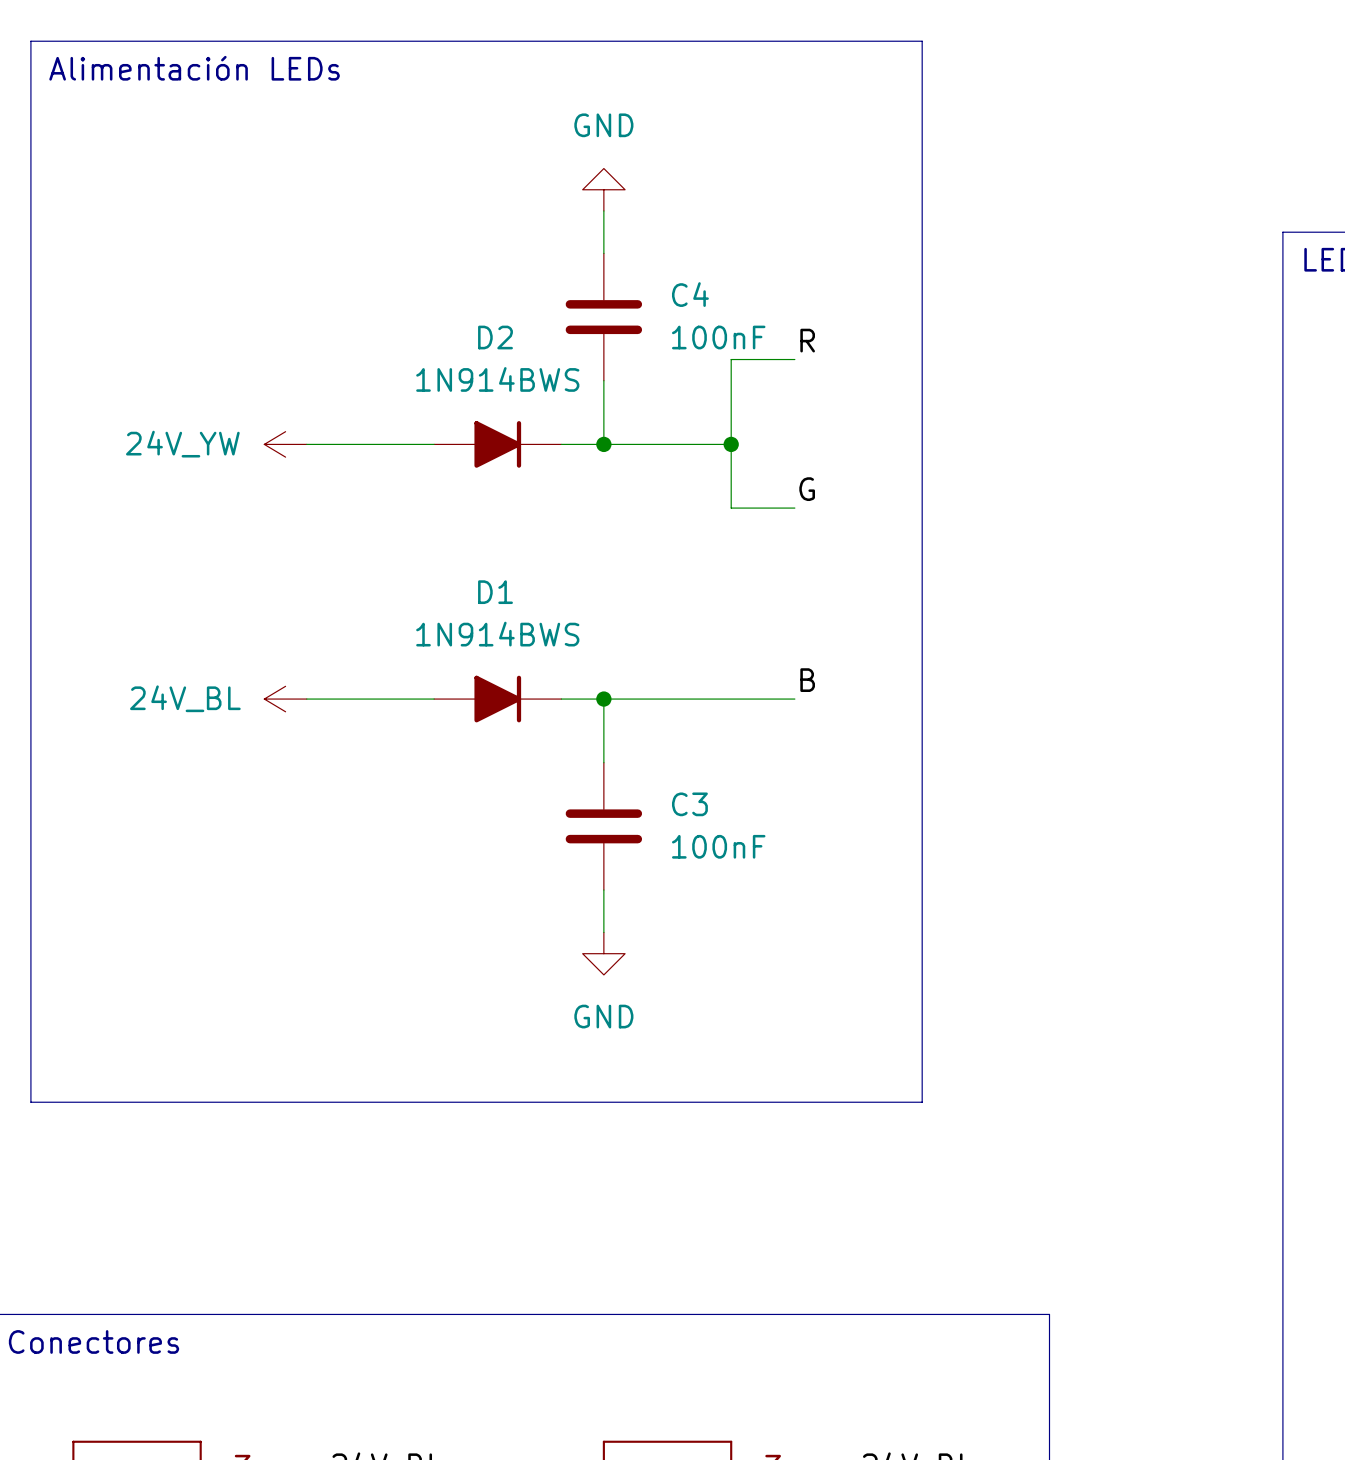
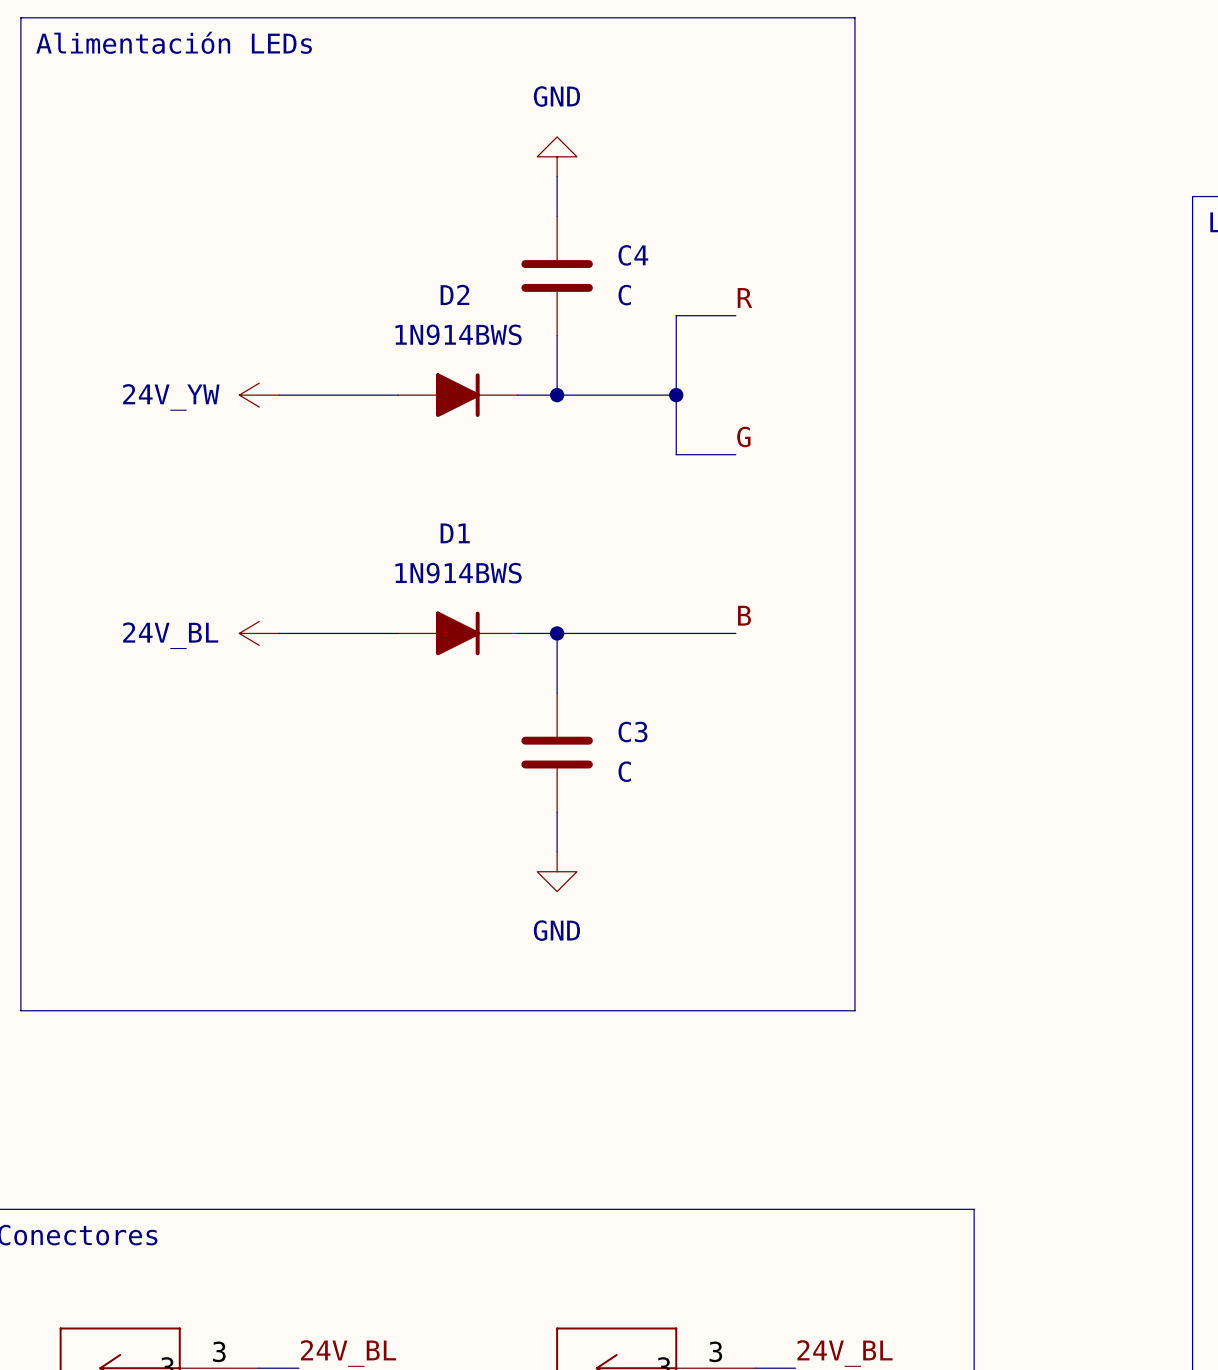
C4 value: 100nF (718, 337) -> C (624, 295)
C3 value: 100nF (718, 846) -> C (624, 771)

